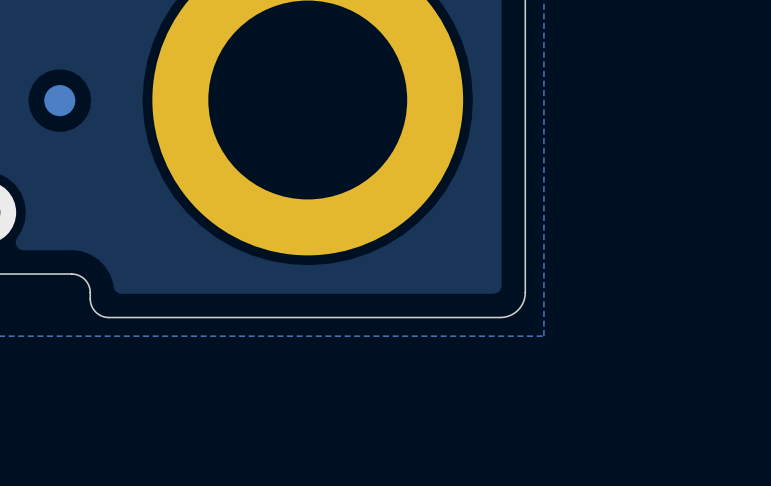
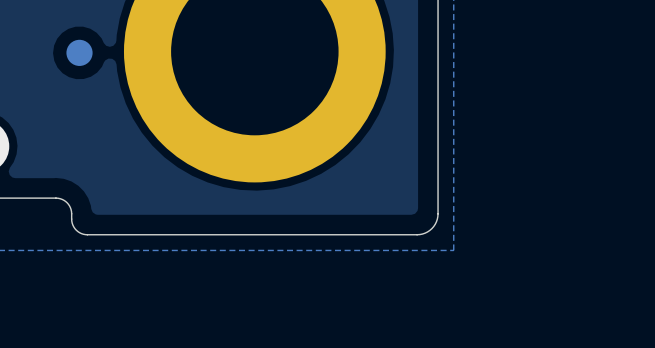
part position: (59, 100) -> (79, 52)

